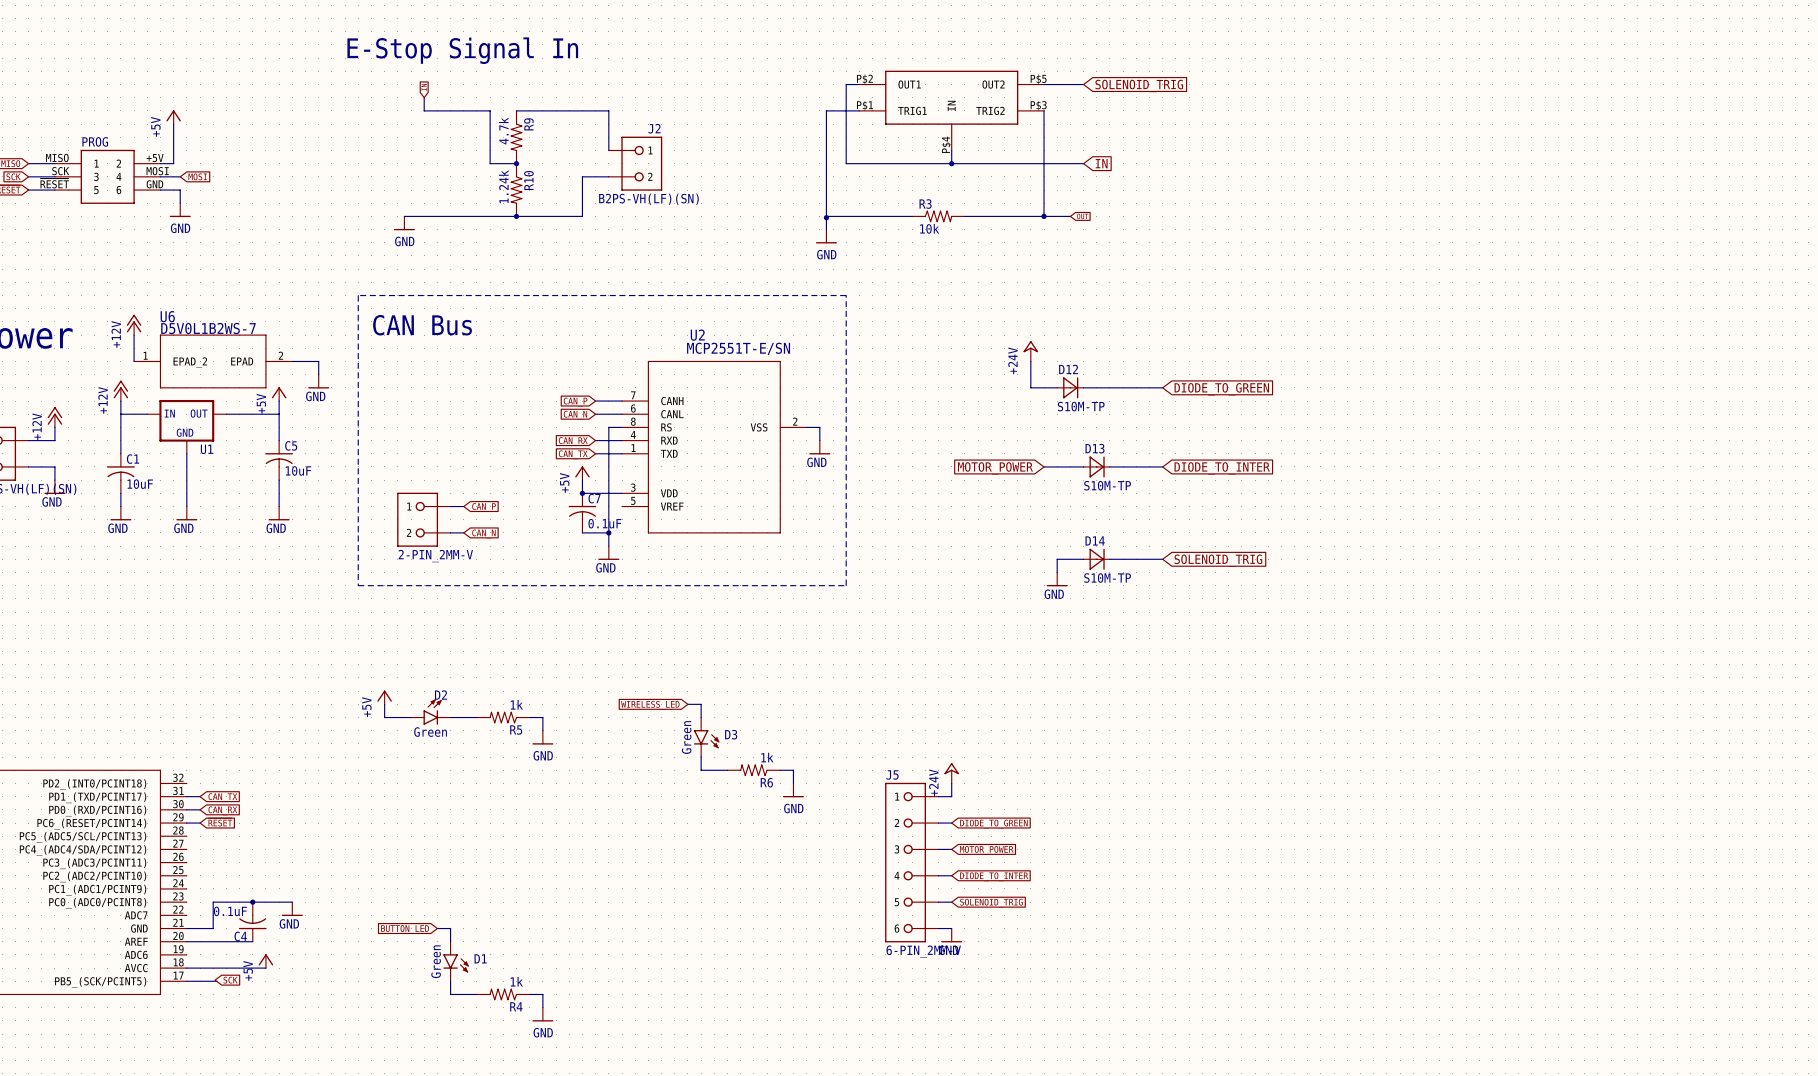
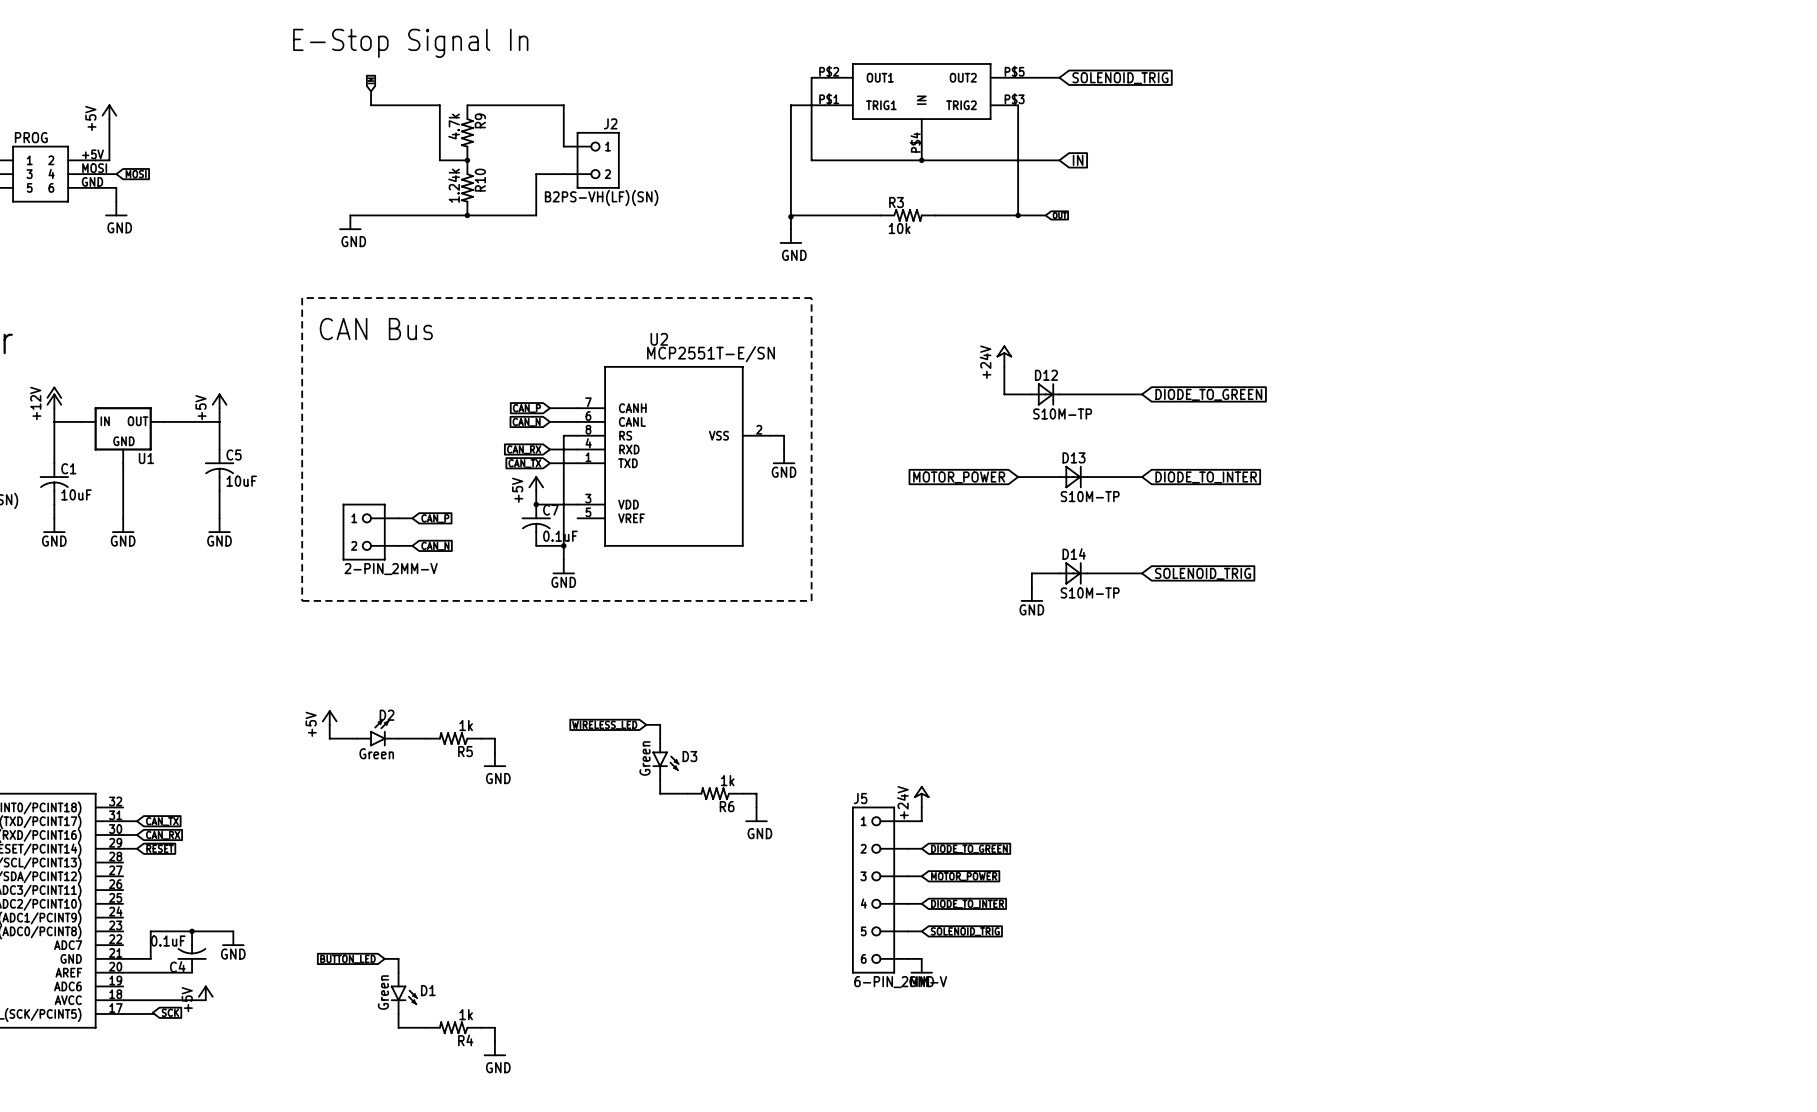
power symbol: +12V (134, 324) -> none
wire: (134, 335) (134, 361) -> none
U6: D5V0L1B2WS-7 (213, 361) -> none
wire: (292, 361) (318, 361) (318, 374) -> none
power symbol: GND (318, 381) -> none

